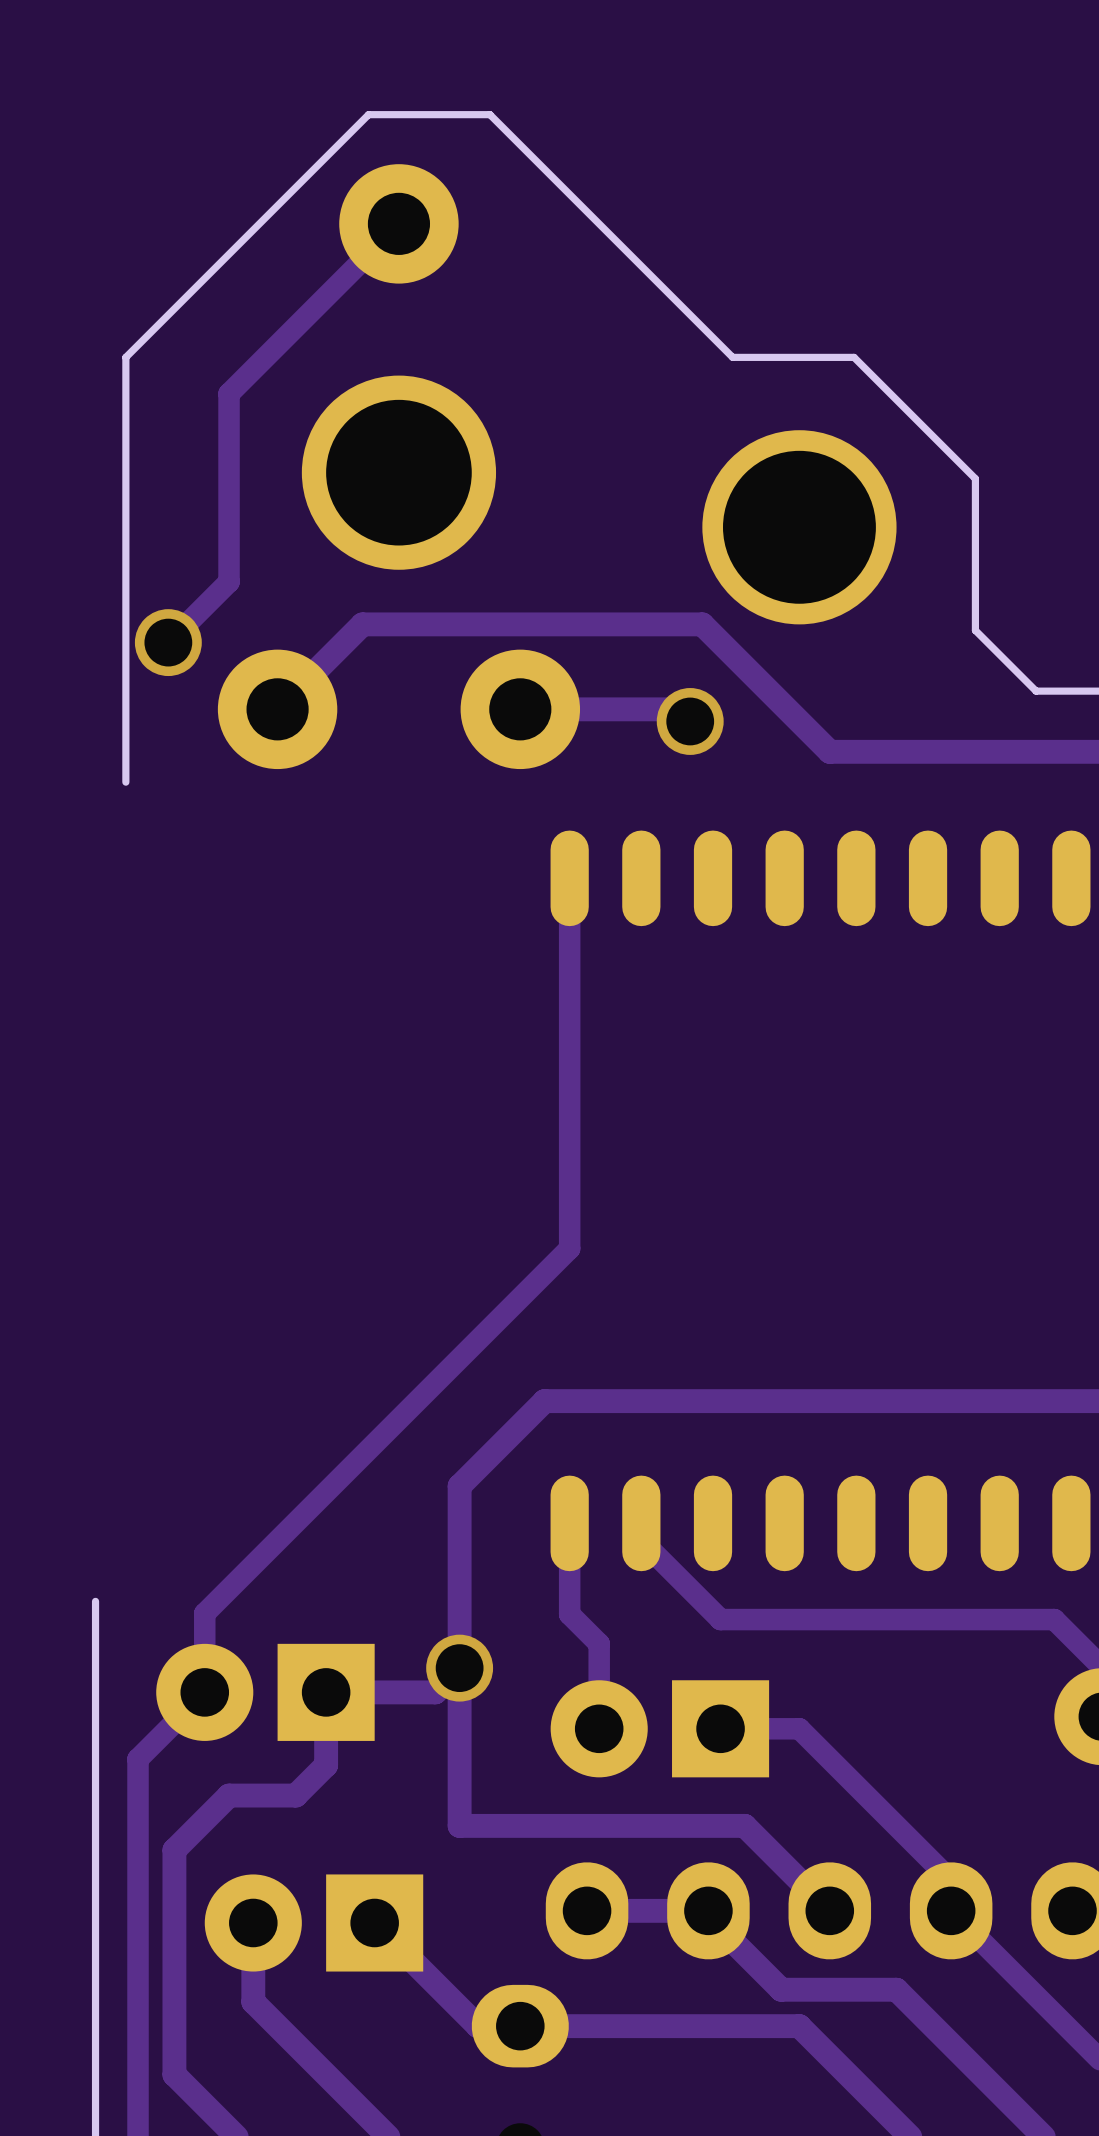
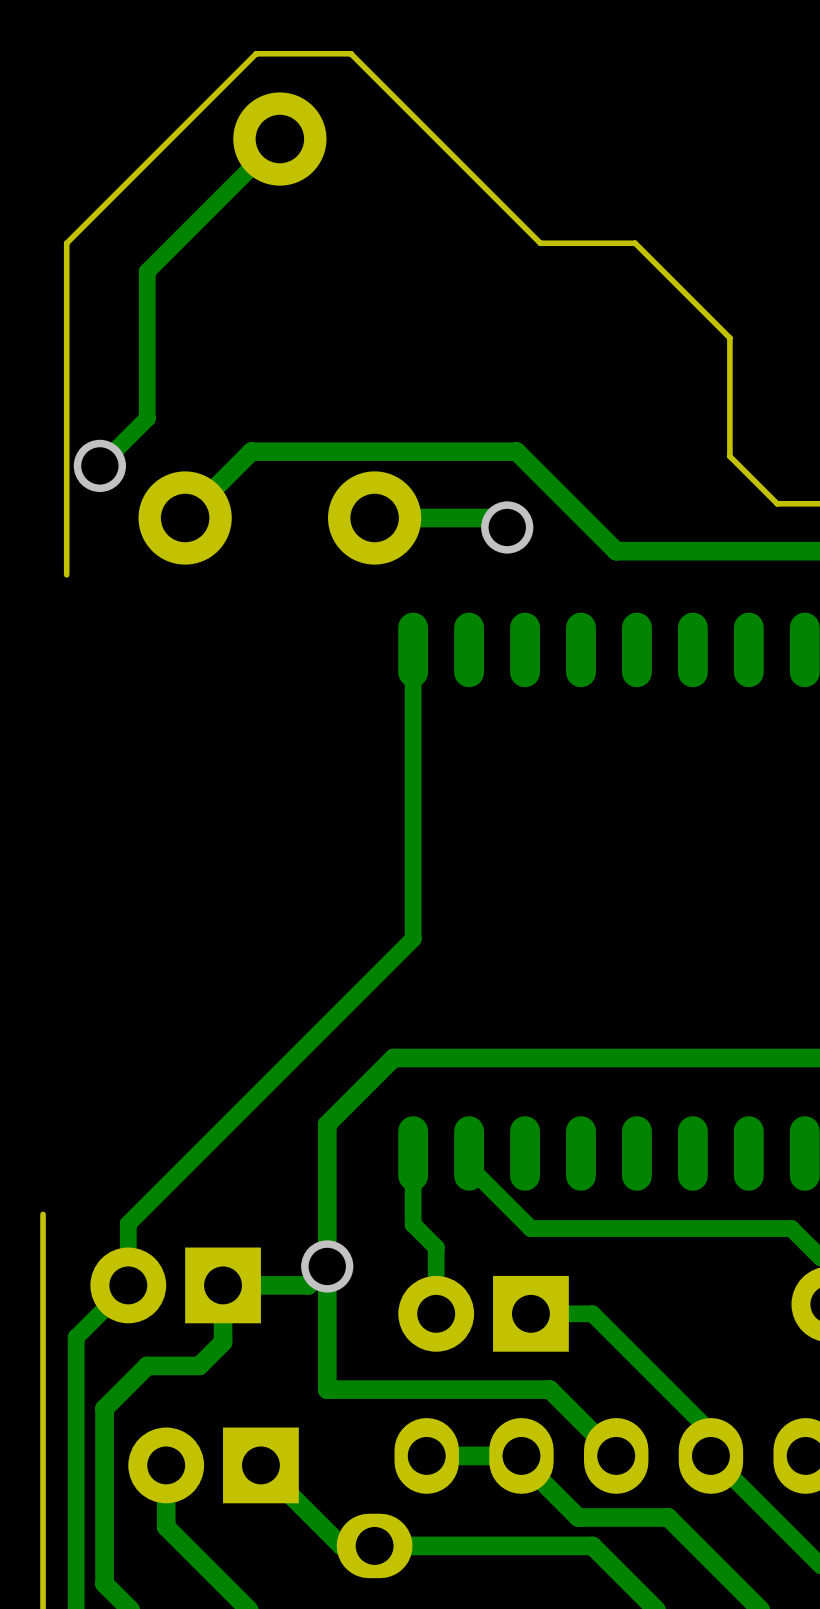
part: (398, 472) -> none
part: (799, 527) -> none

